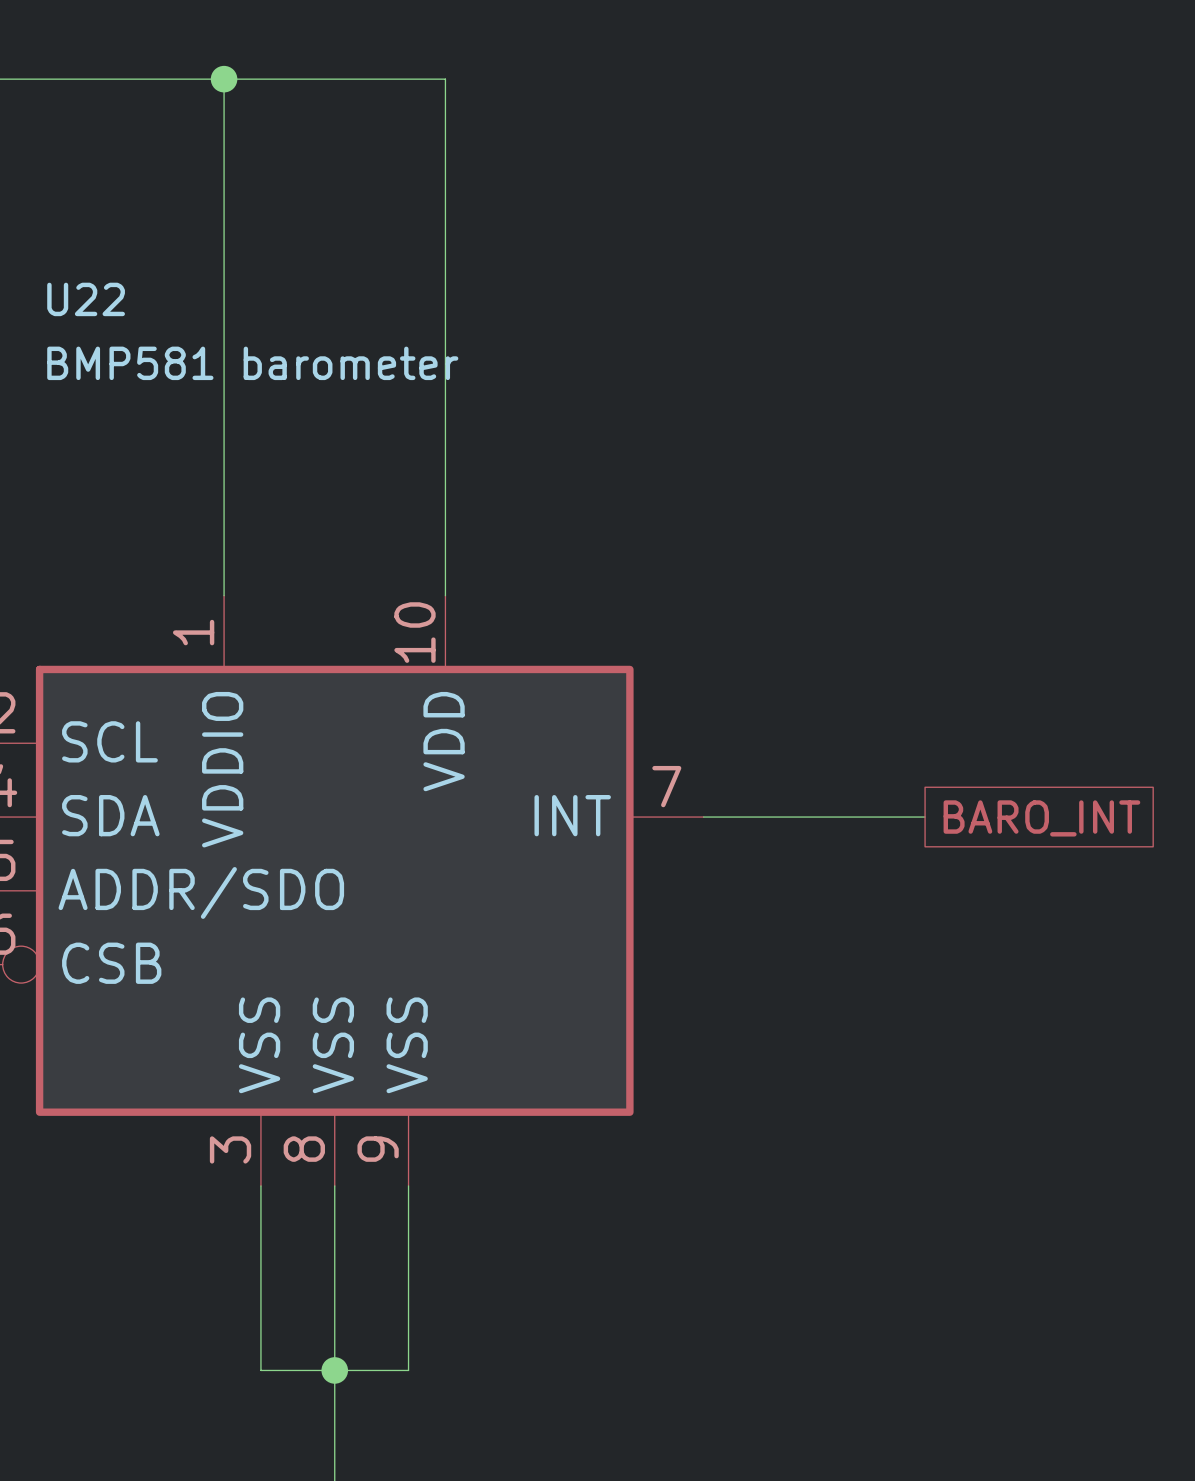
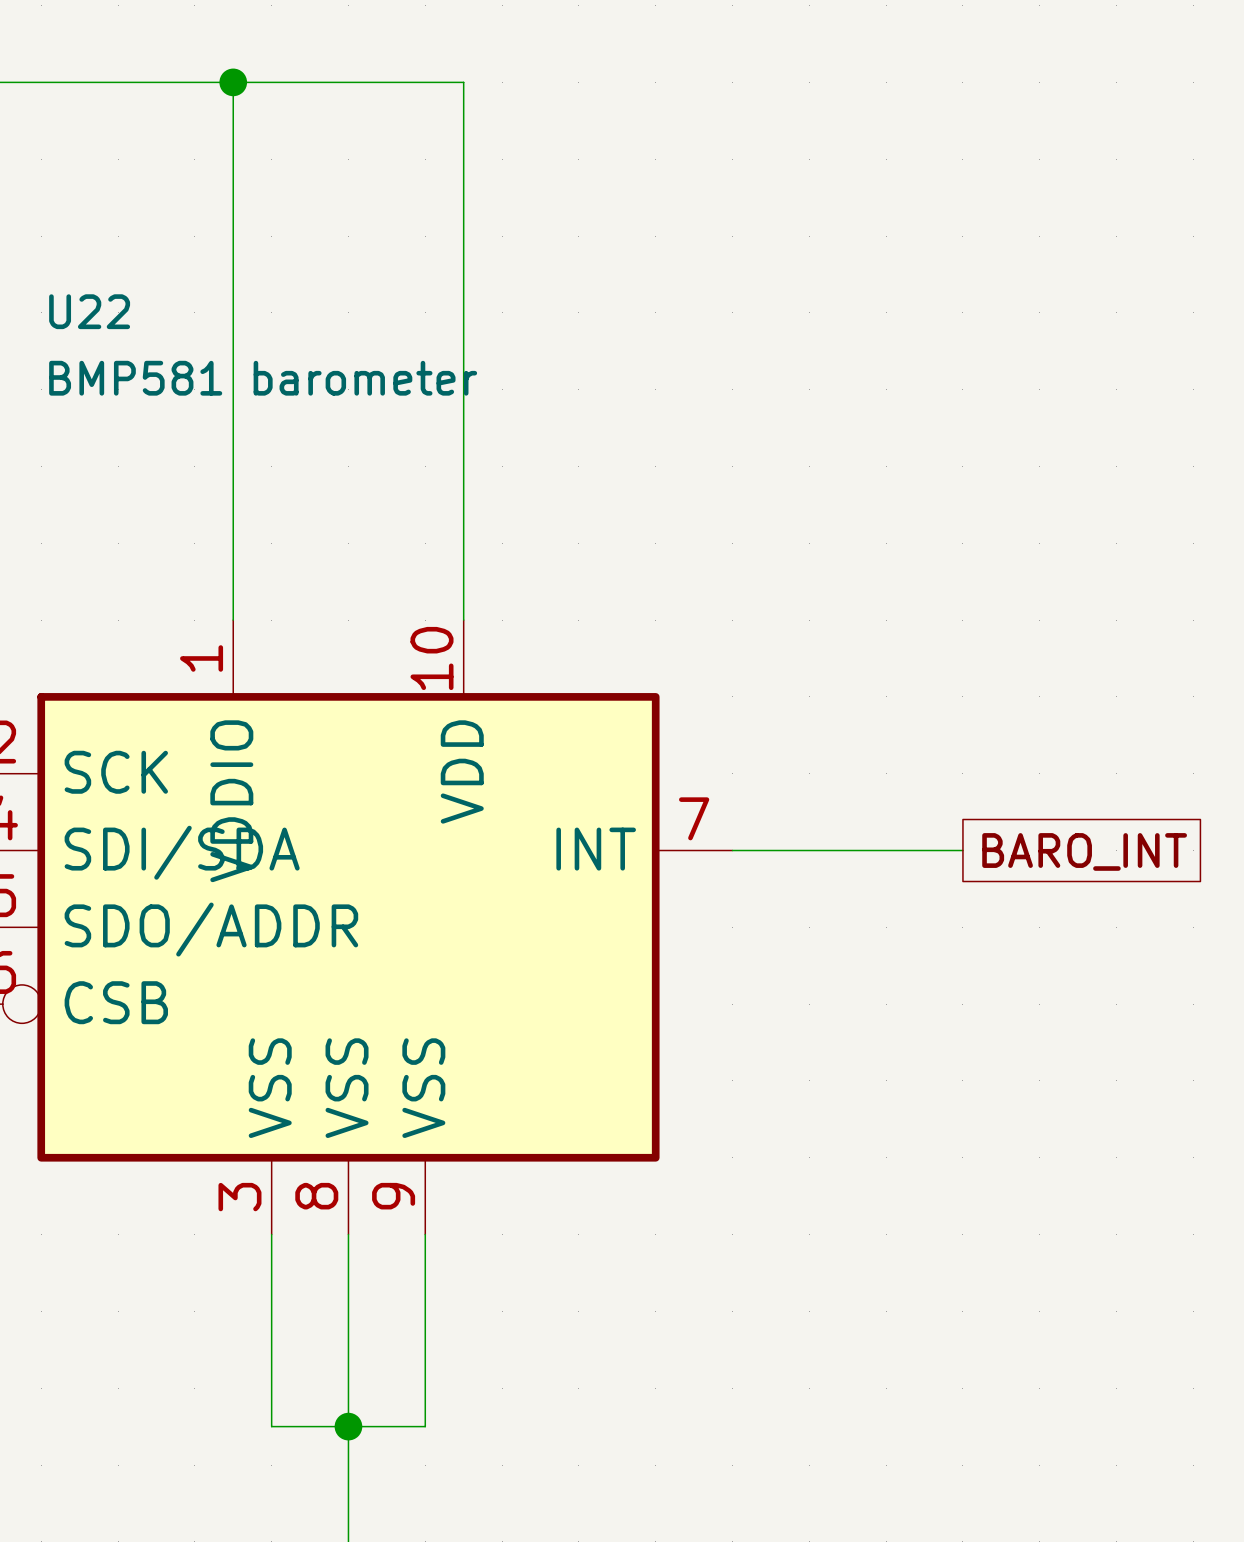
U22 pin name: SCL (109, 741) -> SCK (116, 772)
U22 pin name: SDA (110, 815) -> SDI/SDA (182, 852)
U22 pin name: ADDR/SDO (201, 892) -> SDO/ADDR (211, 929)

